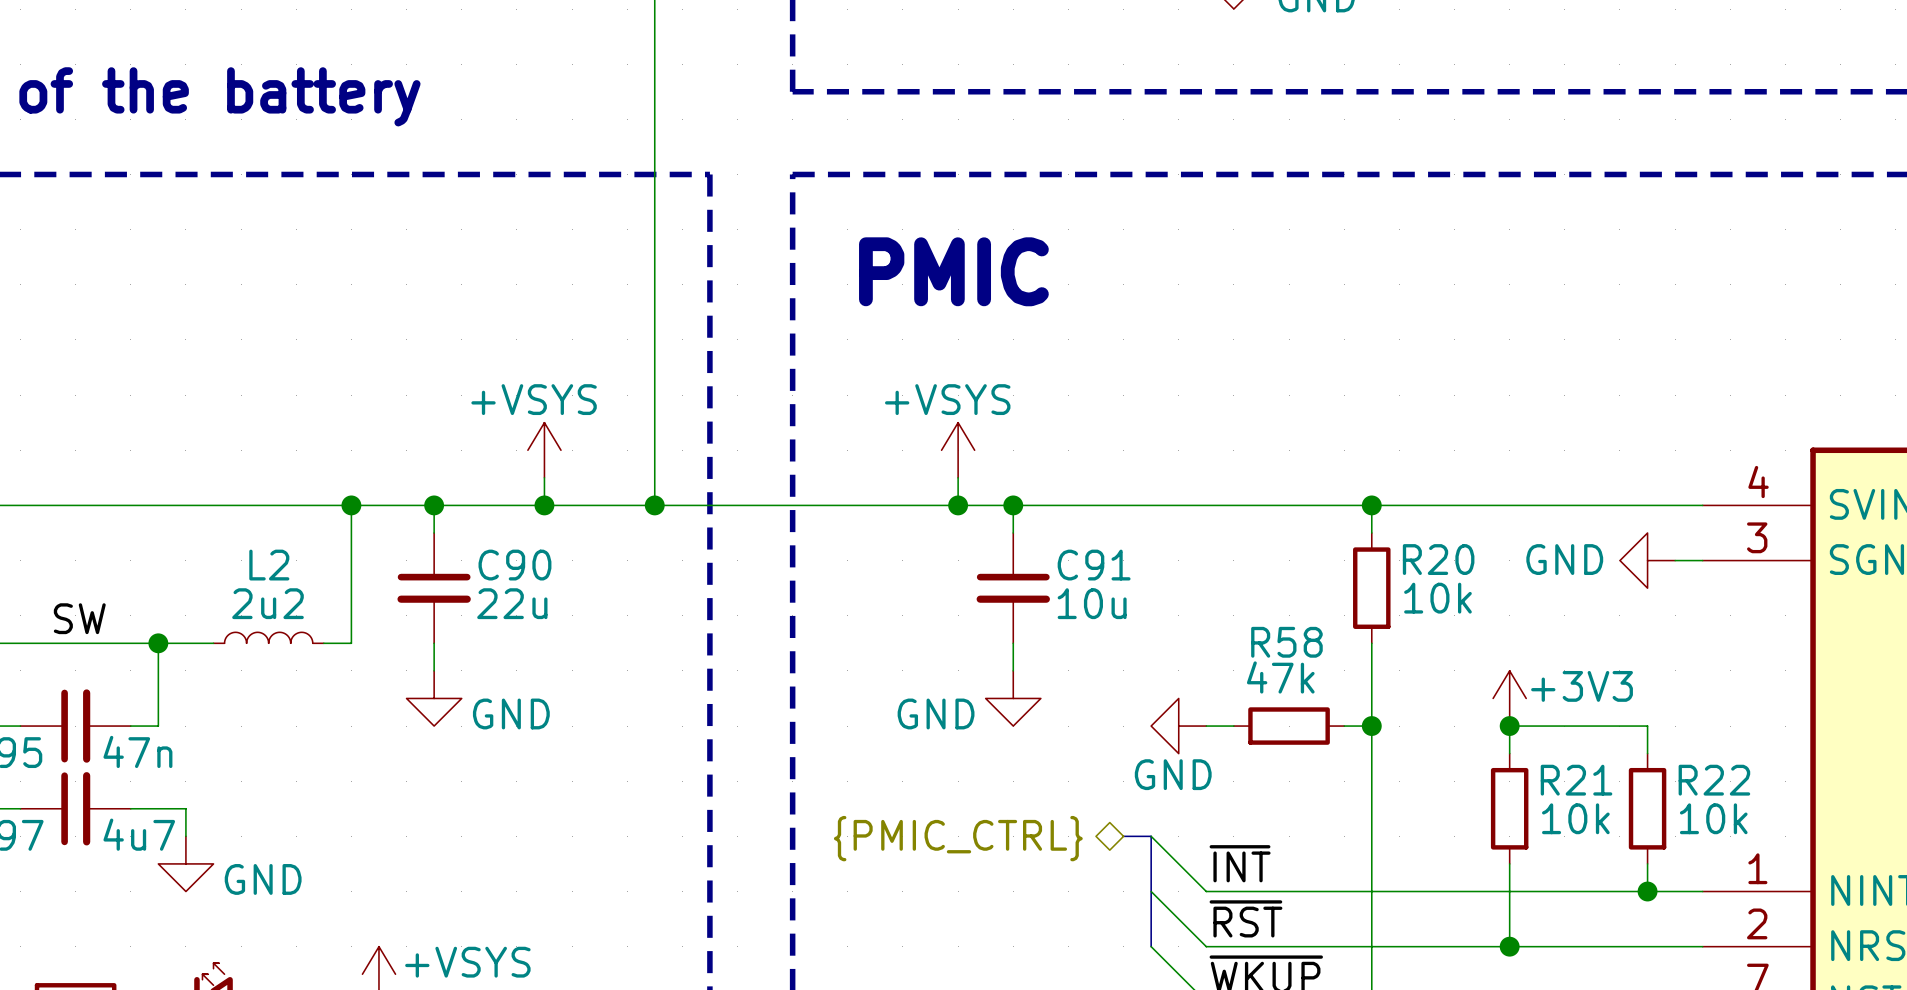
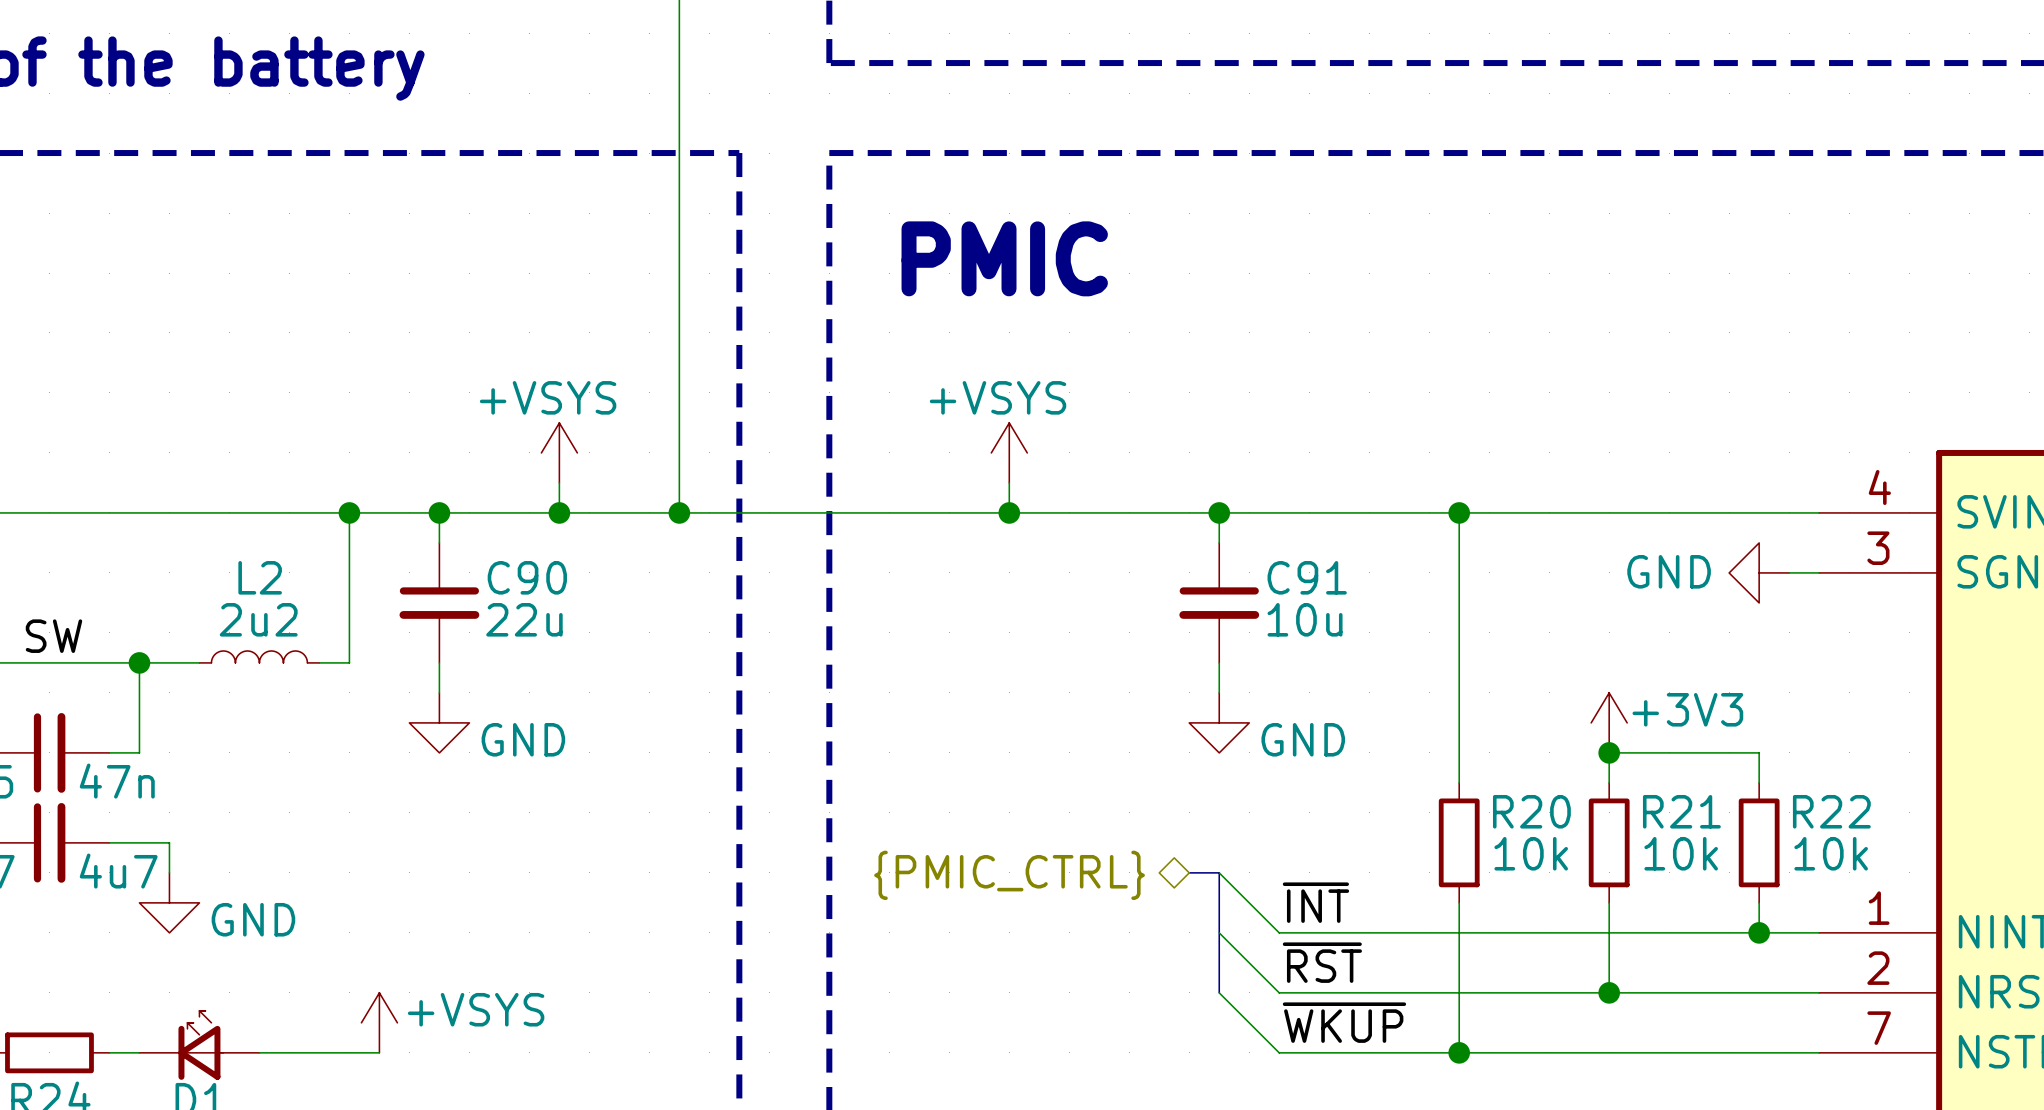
wire: (1013, 505) (1013, 533) -> (1219, 512) (1219, 542)
junction: (1013, 505) -> none
junction: none -> (1219, 512)
C91 position: (1013, 588) -> (1219, 602)
R20 position: (1371, 588) -> (1459, 842)
wire: (1013, 643) (1013, 670) -> (1219, 662) (1219, 692)
power symbol: GND (1013, 698) -> none
power symbol rotation: 0° (1178, 726) -> 90° counterclockwise (1219, 722)
power symbol position: GND (1178, 726) -> GND (1219, 722)
wire: (1206, 726) (1233, 726) -> none
R58: 47k (1289, 726) -> none
wire: (1344, 726) (1371, 726) -> none
junction: (1371, 726) -> none
wire: (1371, 753) (1371, 863) -> (1459, 542) (1459, 662)

